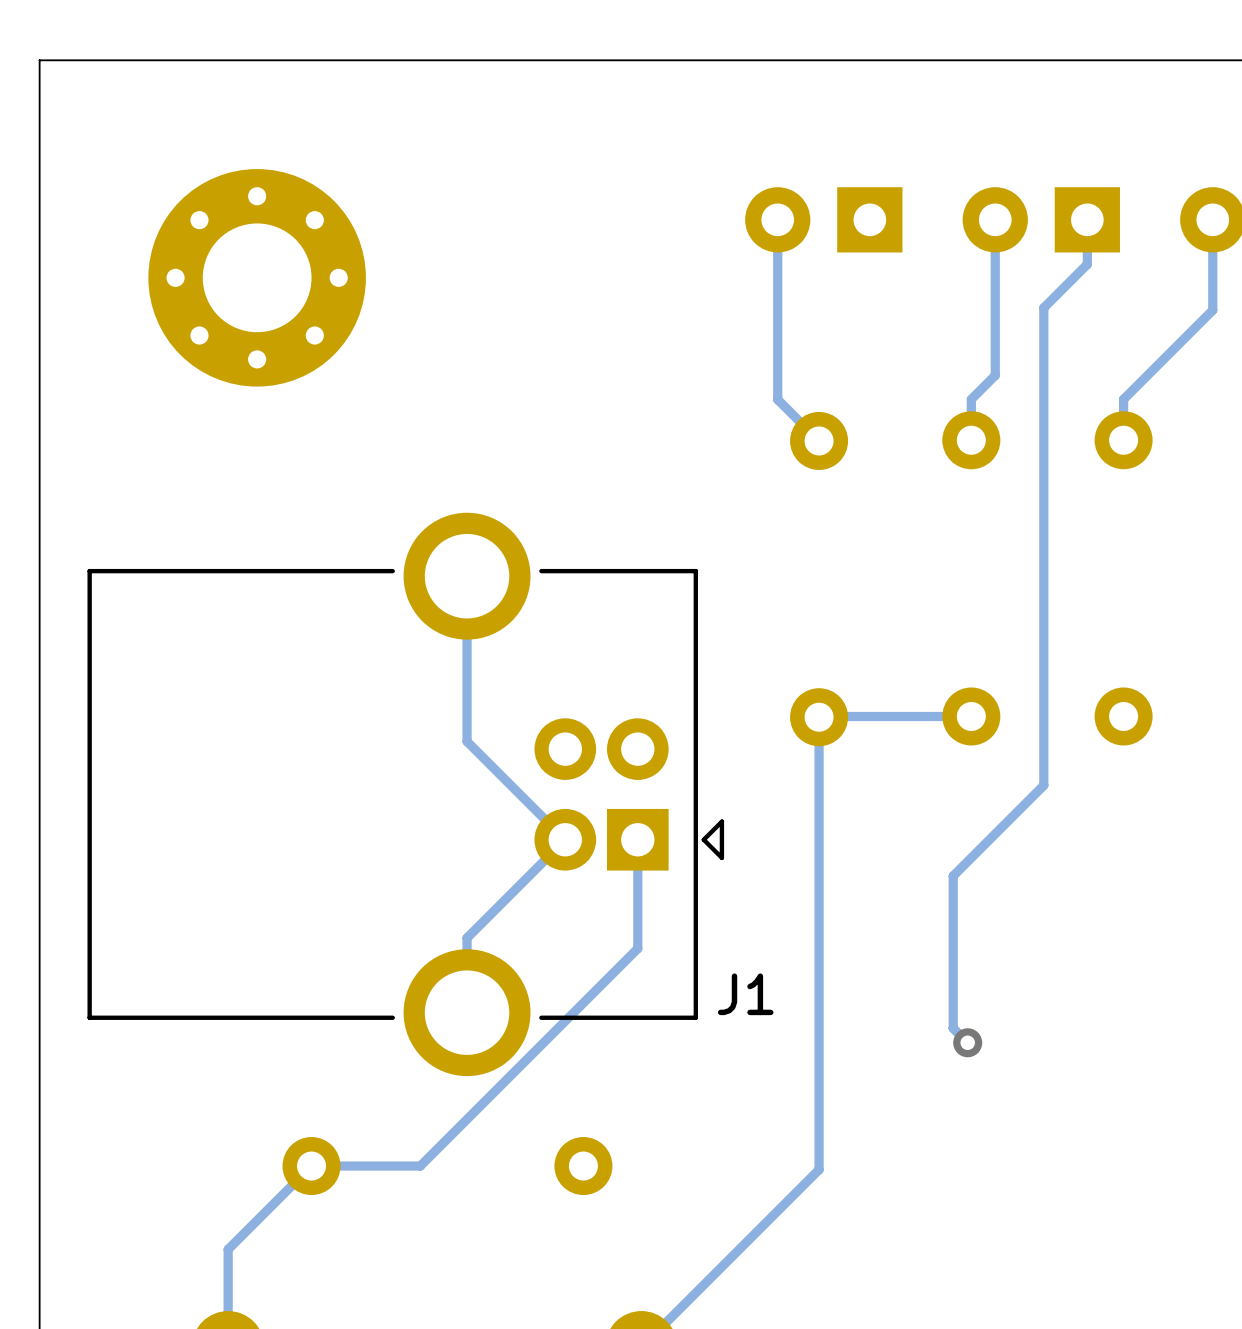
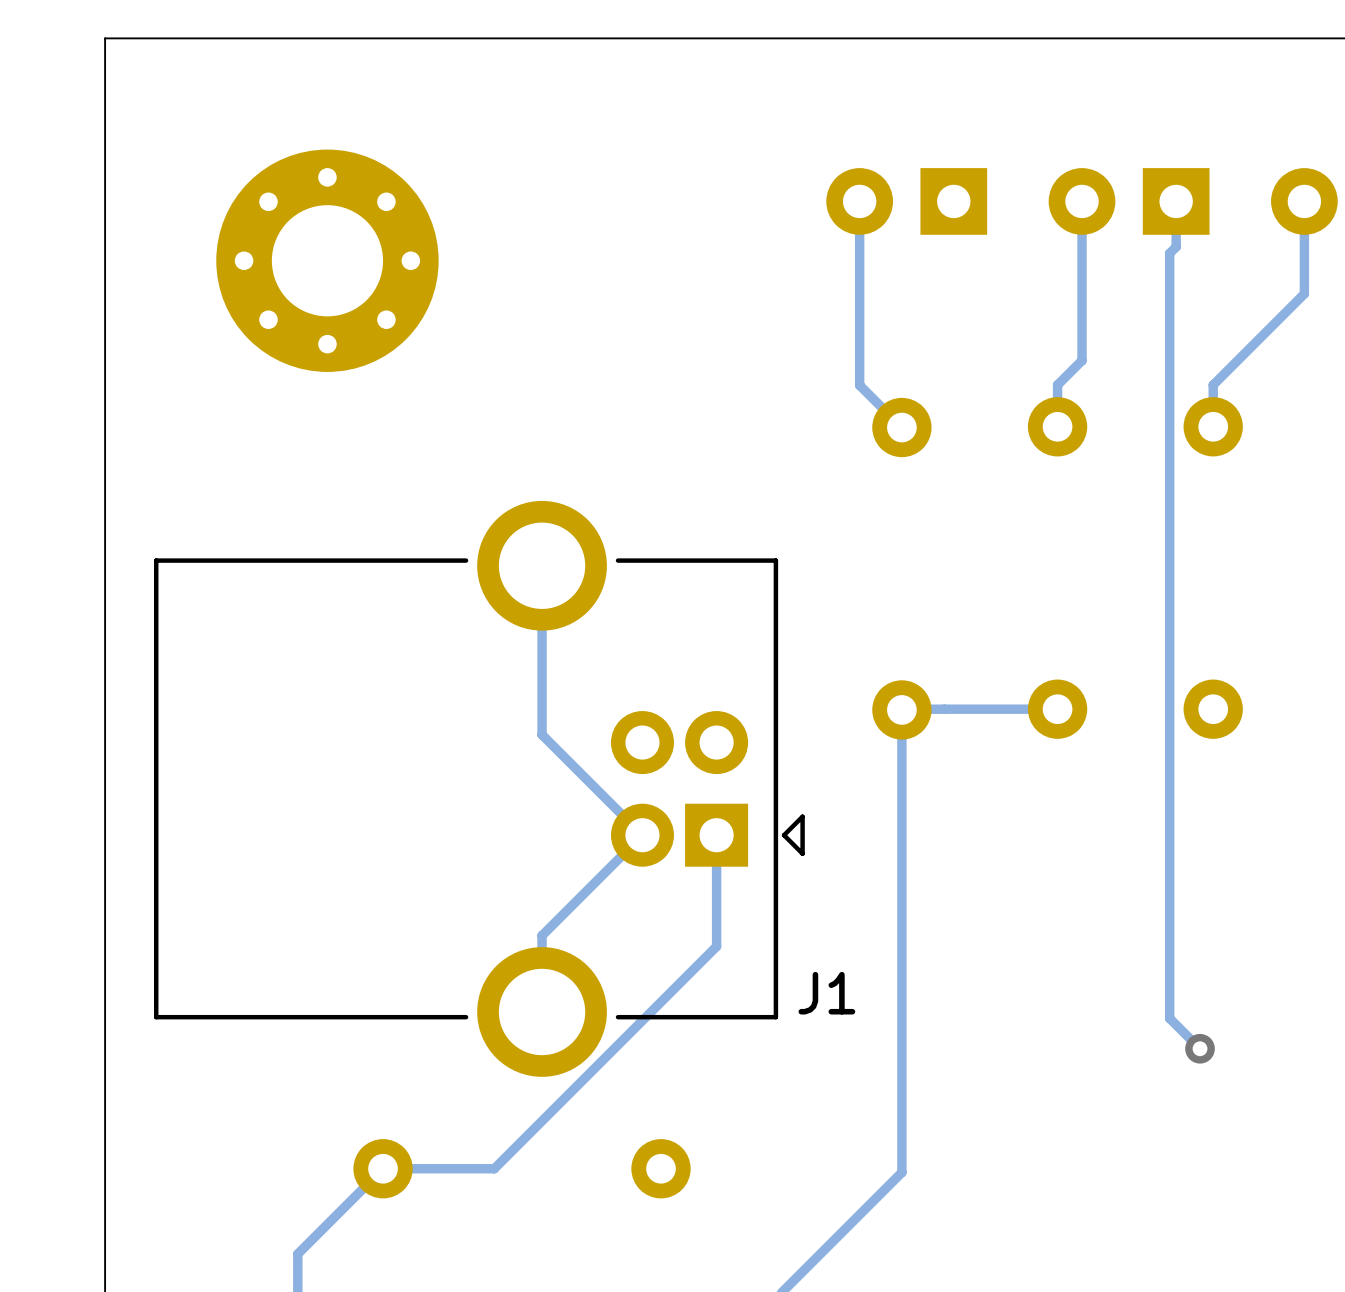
track: (1081, 270) (1043, 307) (1043, 785) (953, 876) (953, 1028) (967, 1042) -> (1169, 253) (1169, 1018) (1200, 1048)
via position: (967, 1042) -> (1200, 1048)

